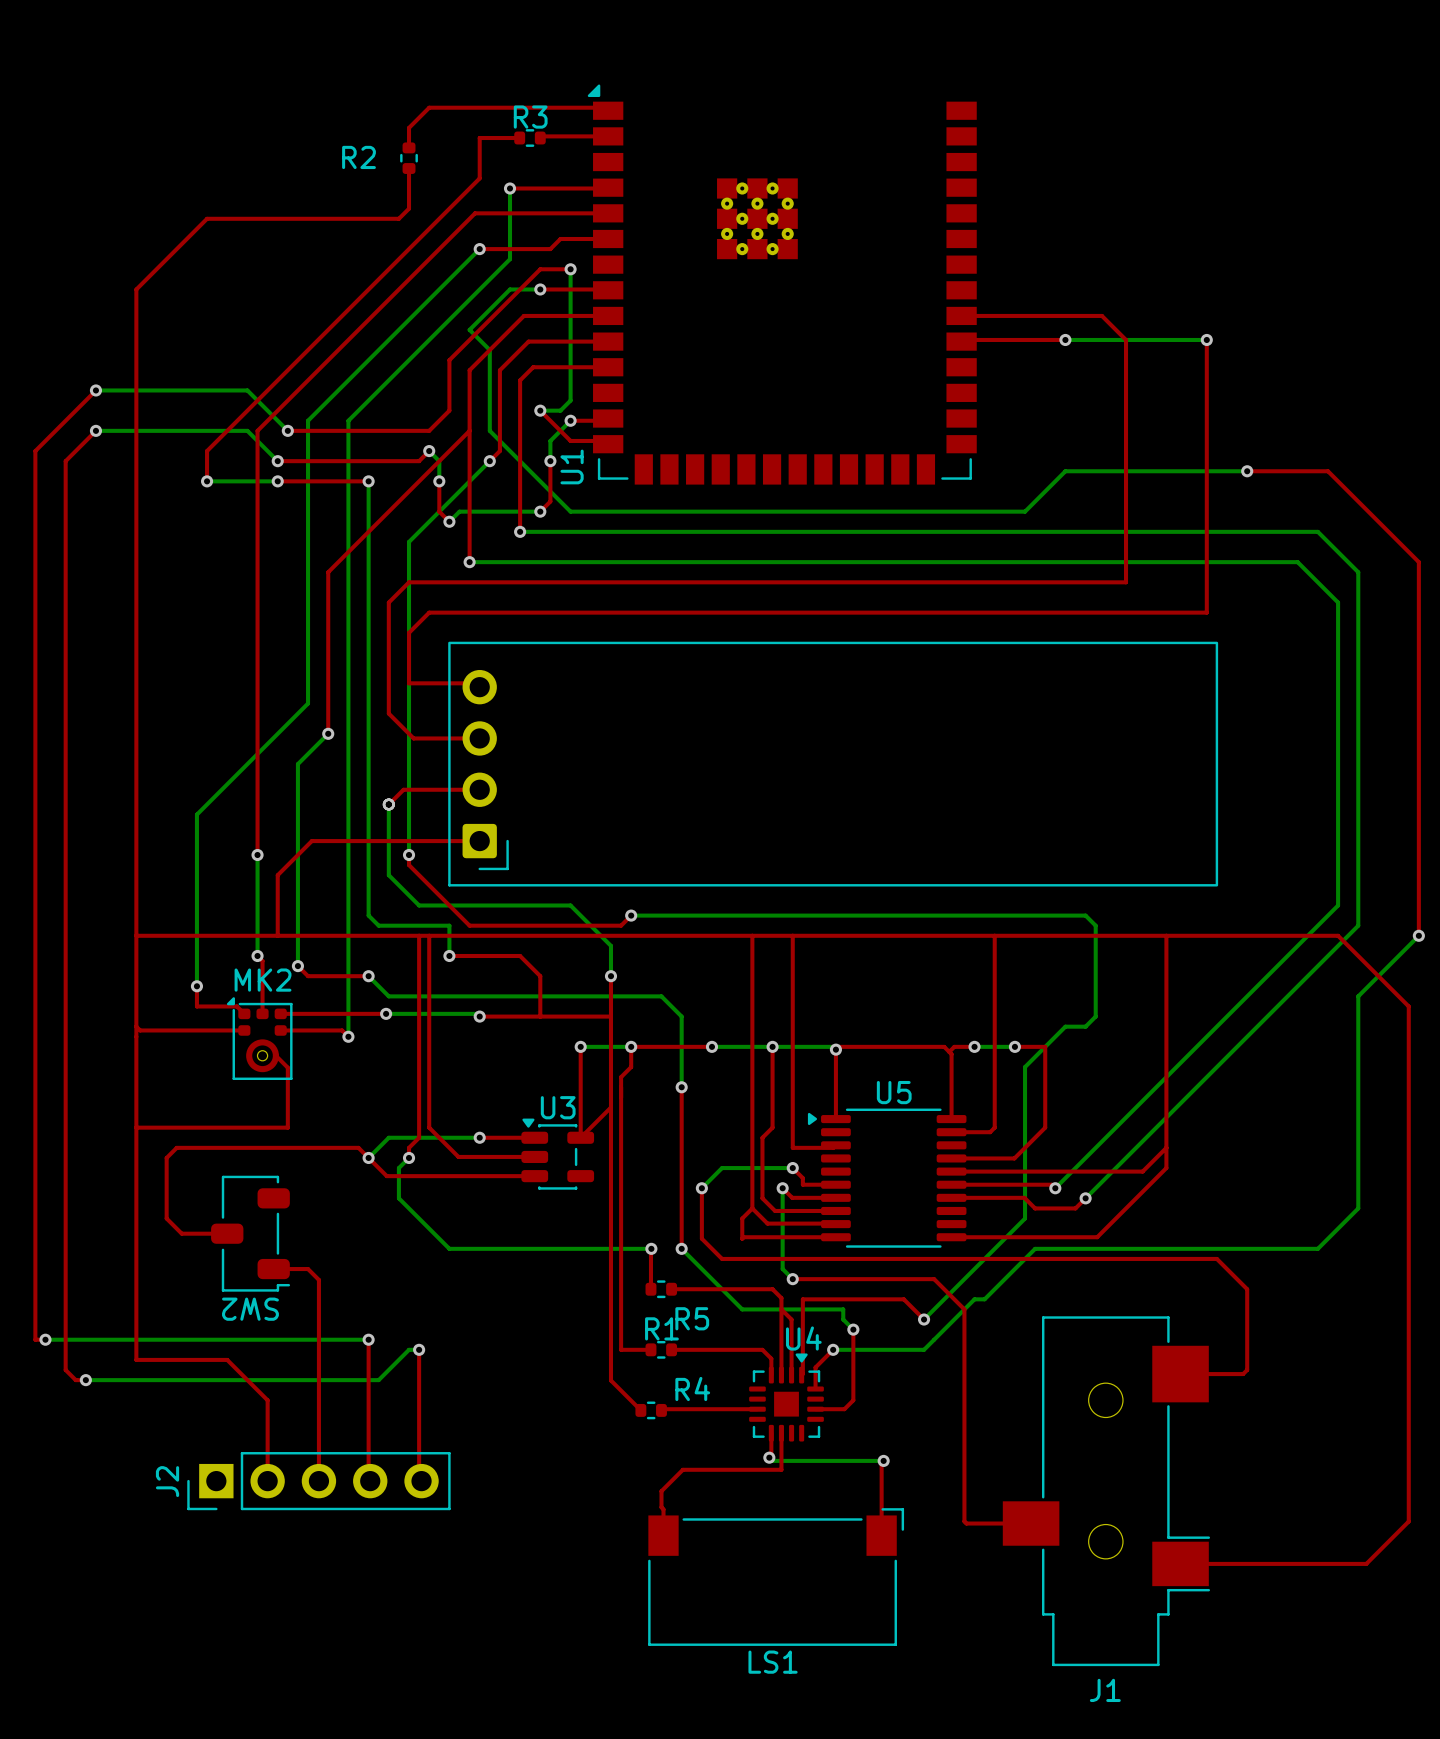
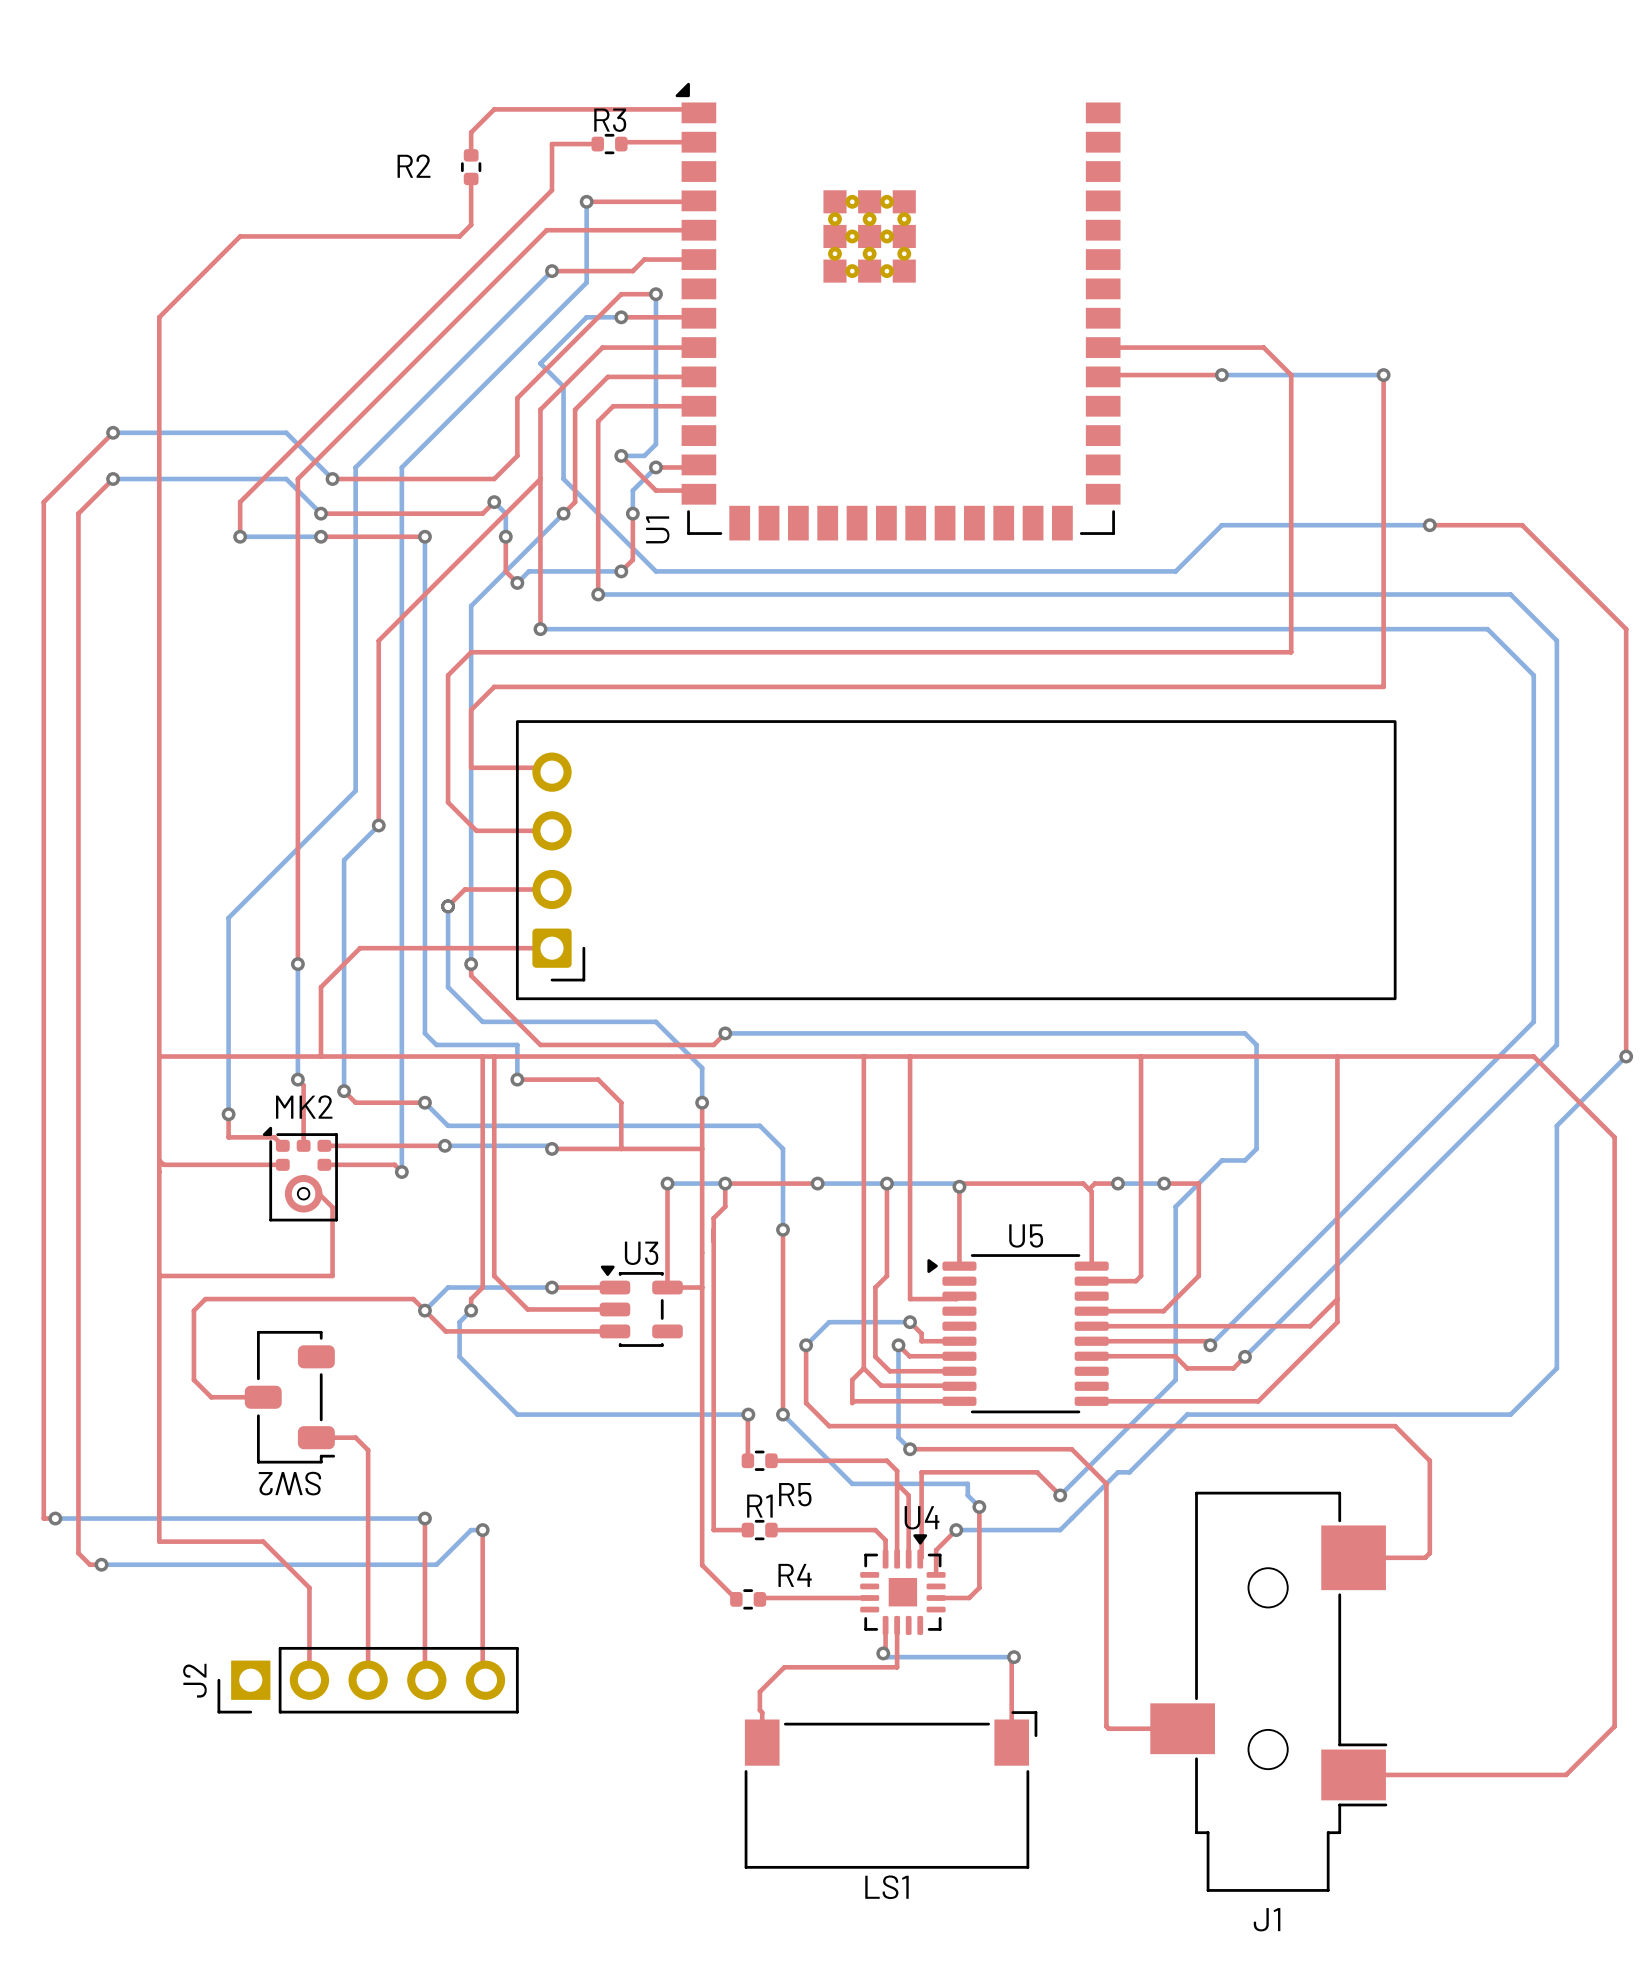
top track: (610, 1107) (580, 1137) -> (702, 1287) (667, 1287)

